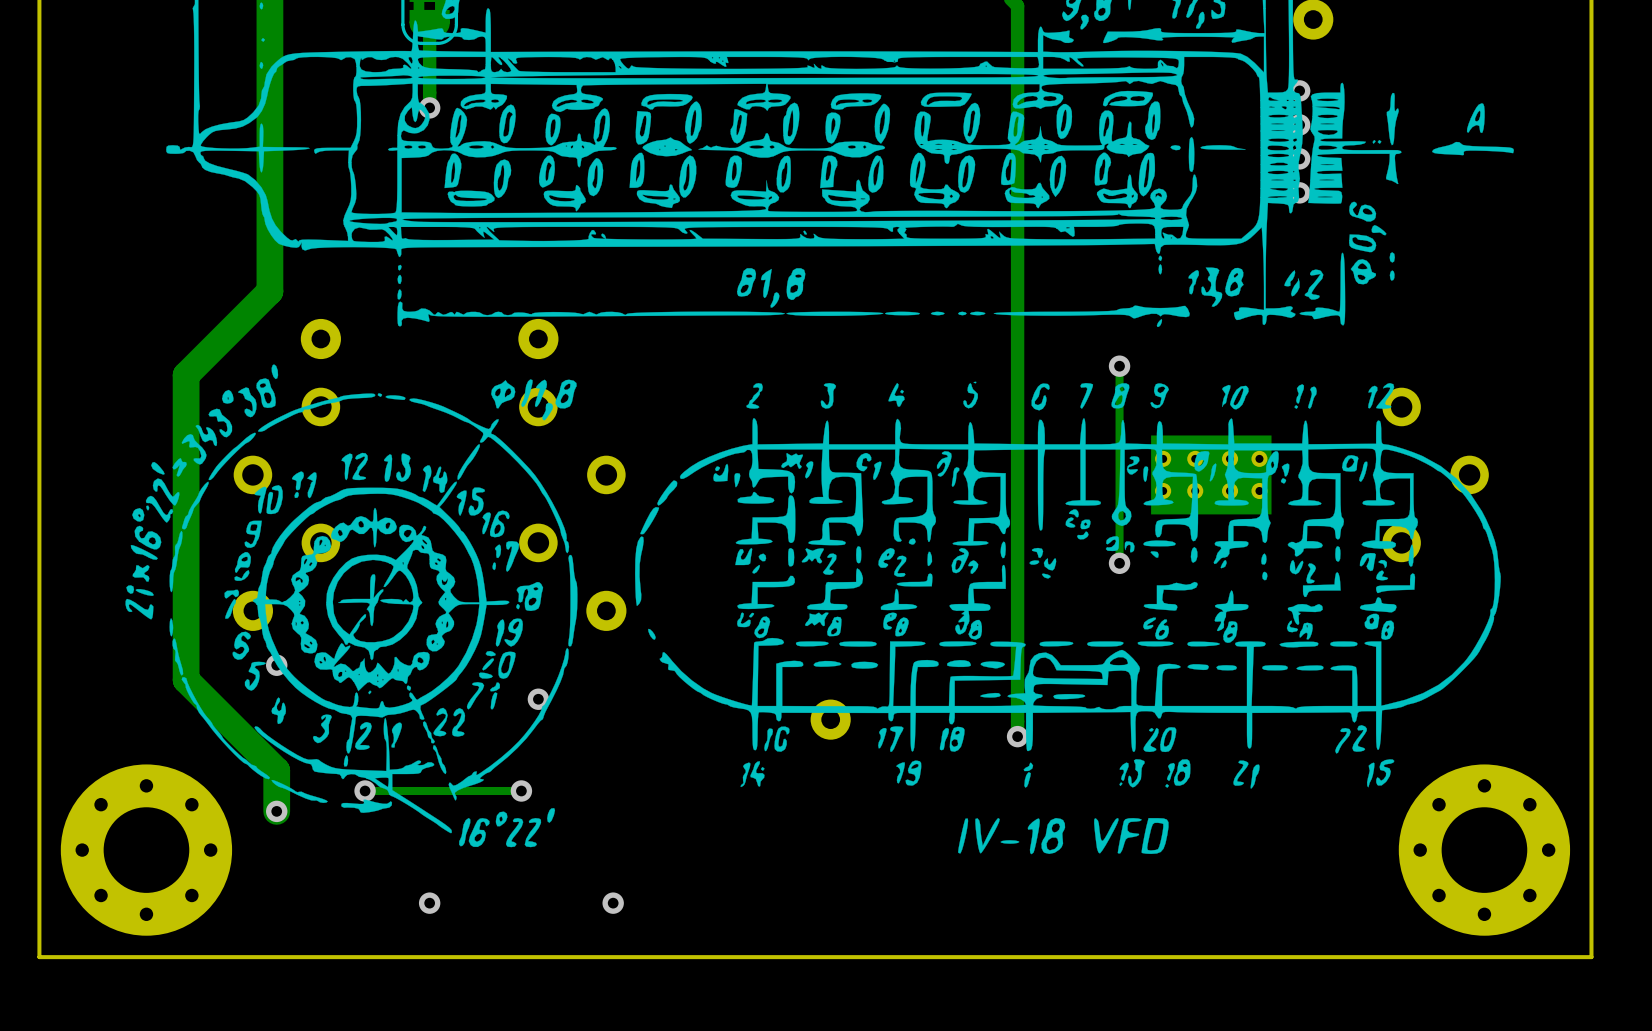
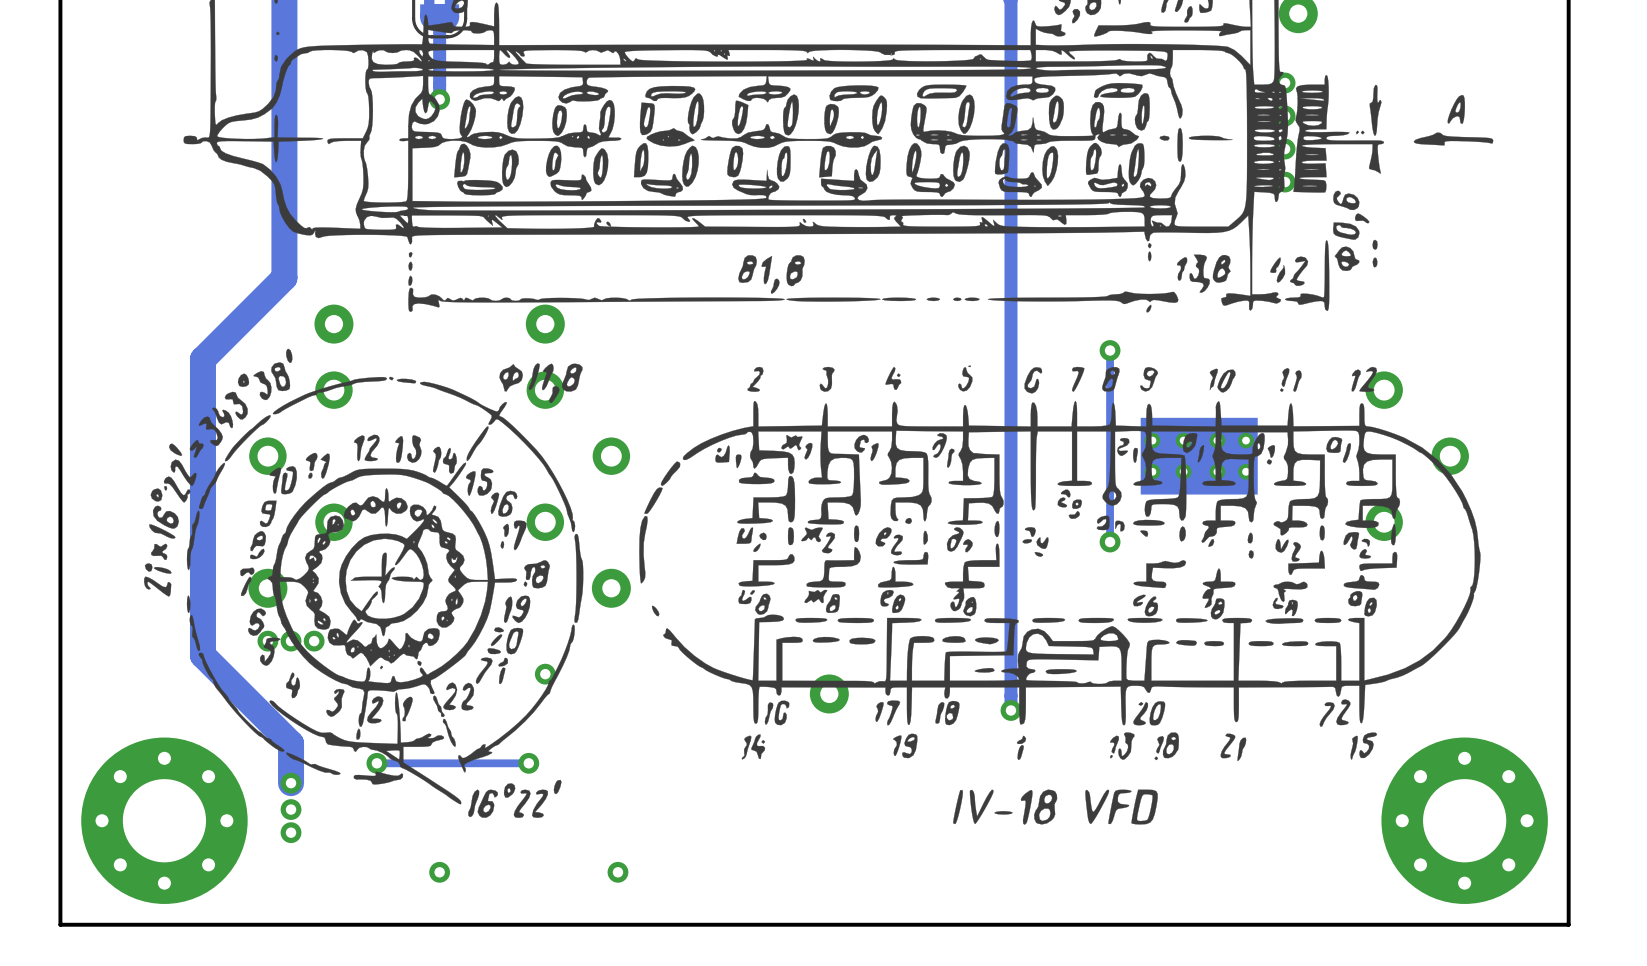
via: none -> (267, 641)
via: none -> (314, 641)
via: none -> (291, 809)
via: none -> (291, 832)

